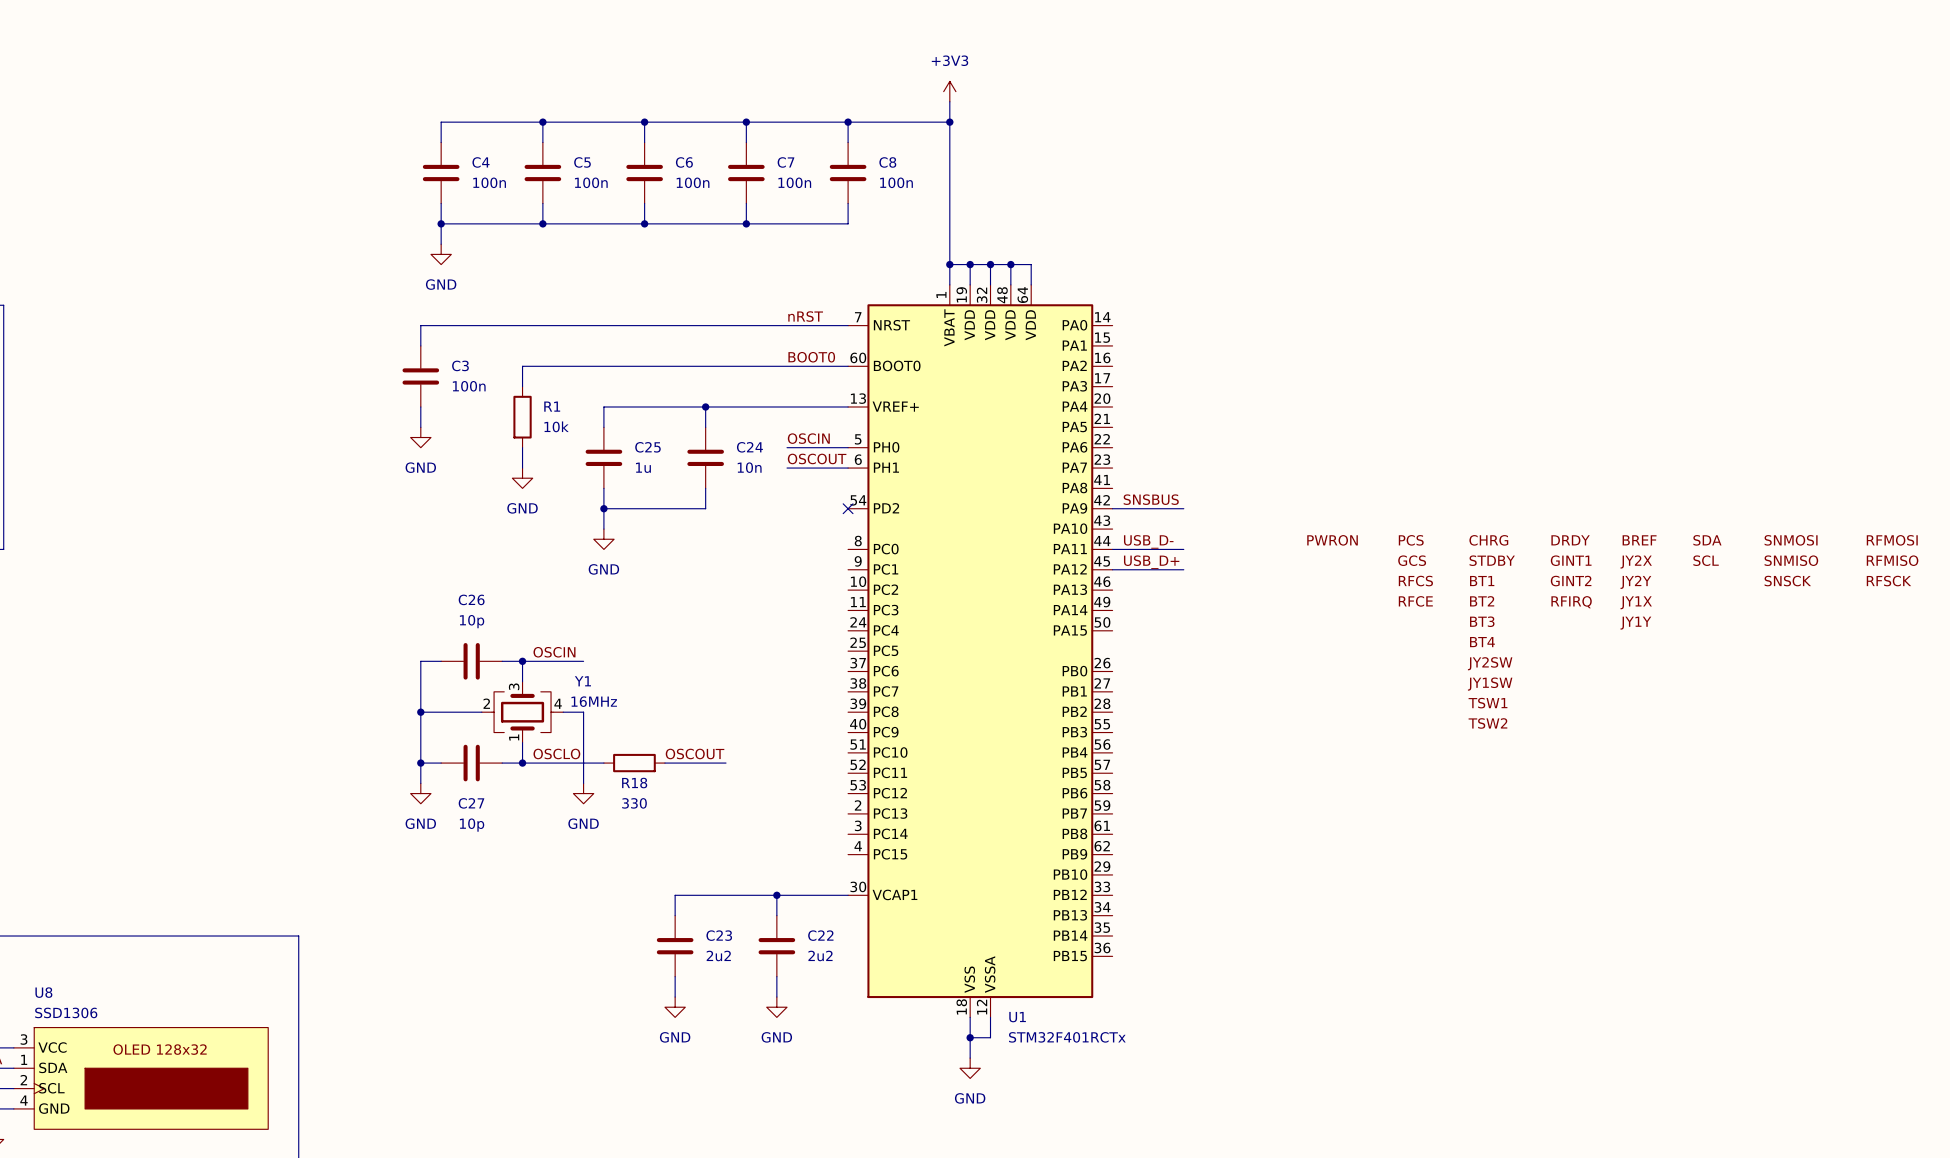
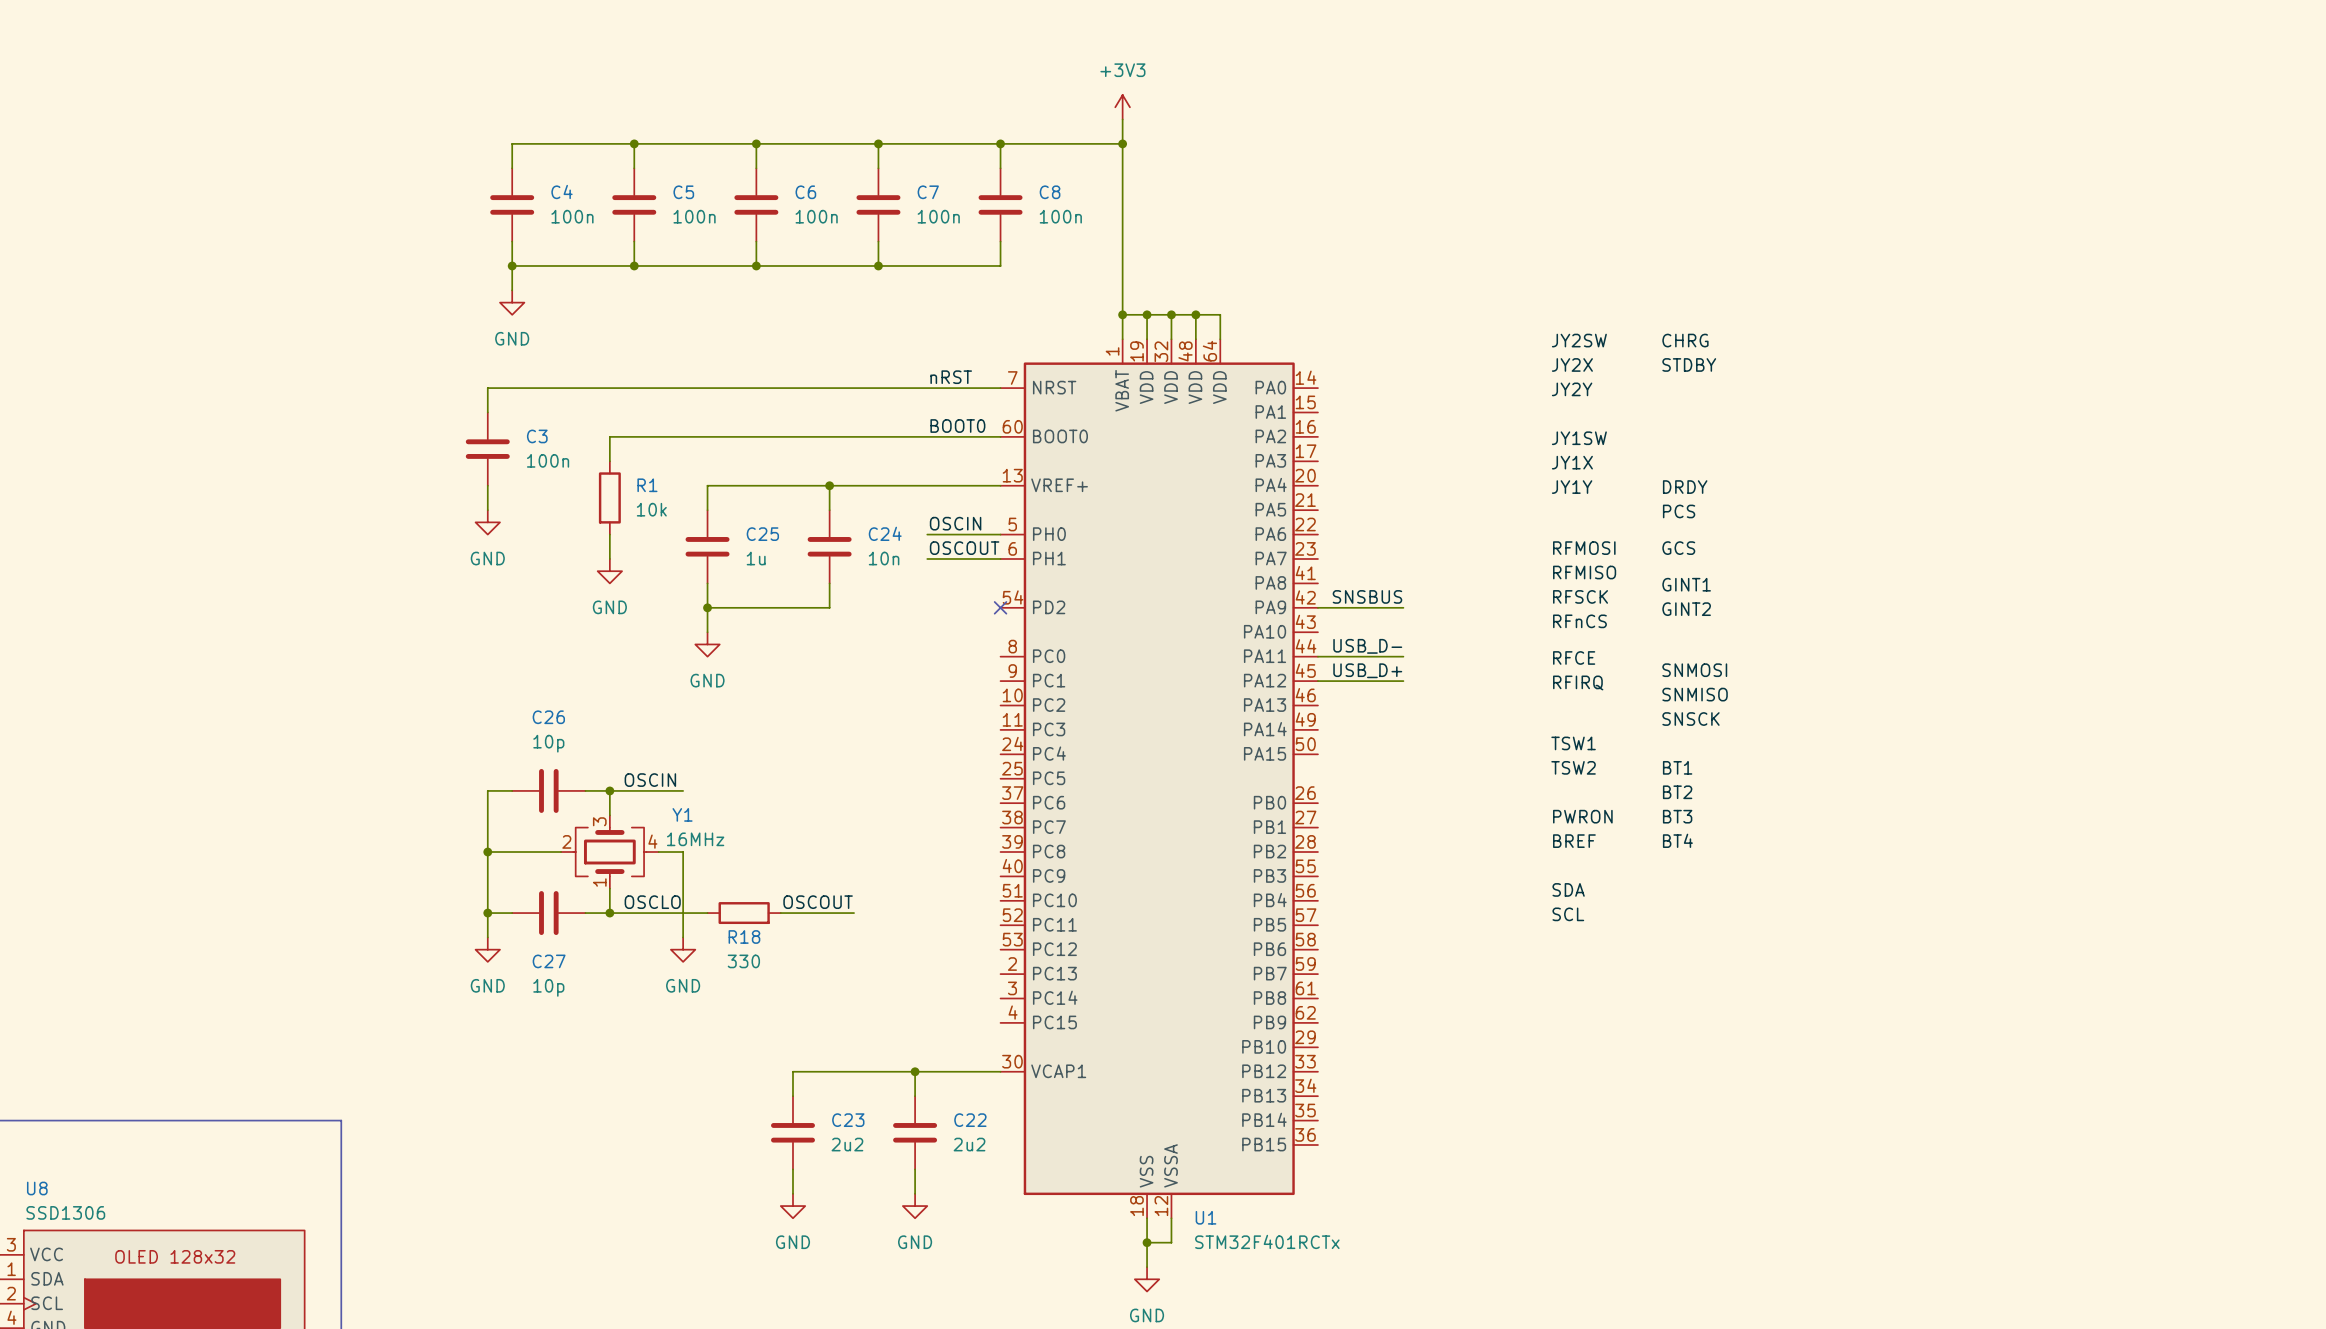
label: none -> CHRG (1685, 340)
label: none -> JY2SW (1579, 340)
label: none -> STDBY (1689, 364)
label: none -> JY2X (1572, 364)
label: none -> JY2Y (1572, 389)
label: none -> JY1SW (1579, 438)
label: none -> JY1X (1572, 462)
label: none -> DRDY (1685, 487)
label: none -> JY1Y (1572, 487)
label: none -> RFMOSI (1584, 548)
label: none -> GCS (1678, 548)
label: none -> RFMISO (1584, 572)
label: none -> RFSCK (1580, 596)
label: none -> RFnCS (1579, 621)
label position: PWRON (1332, 540) -> PWRON (1582, 816)
label position: PCS (1411, 540) -> PCS (1679, 511)
label: CHRG (1488, 540) -> none
label: DRDY (1570, 540) -> none
label: BREF (1639, 540) -> none
label: SDA (1707, 540) -> none
label: SNMOSI (1791, 540) -> none
label: RFMOSI (1892, 540) -> none
label: none -> RFCE (1574, 657)
label: GCS (1412, 560) -> SNMOSI (1694, 670)
label: STDBY (1492, 560) -> none
label position: GINT1 (1571, 560) -> GINT1 (1686, 584)
label: SCL (1706, 560) -> none
label: SNMISO (1791, 560) -> none
label: RFMISO (1892, 560) -> none
label: JY2X (1636, 561) -> none
label: none -> RFIRQ (1578, 682)
label: RFCS (1415, 581) -> SNMISO (1695, 694)
label position: BT1 (1482, 581) -> BT1 (1677, 767)
label position: GINT2 (1571, 581) -> GINT2 (1686, 609)
label: SNSCK (1787, 581) -> none
label: RFSCK (1888, 581) -> none
label: JY2Y (1635, 582) -> none
label: RFCE (1415, 601) -> SNSCK (1690, 719)
label position: BT2 (1482, 601) -> BT2 (1677, 792)
label: RFIRQ (1571, 602) -> none
label: JY1X (1636, 602) -> none
label position: BT3 (1482, 621) -> BT3 (1677, 816)
label: JY1Y (1635, 623) -> none
label position: BT4 (1482, 642) -> BT4 (1677, 840)
label: JY2SW (1490, 663) -> none
label: JY1SW (1490, 684) -> none
label: none -> BREF (1574, 841)
label position: TSW1 (1488, 703) -> TSW1 (1573, 743)
label position: TSW2 (1487, 723) -> TSW2 (1573, 767)
label: none -> SDA (1568, 889)
label: none -> SCL (1568, 914)

